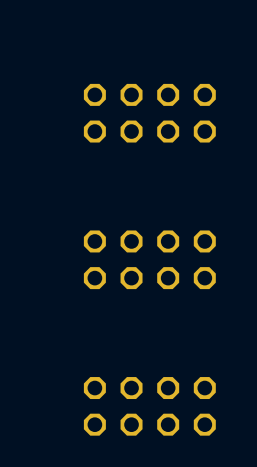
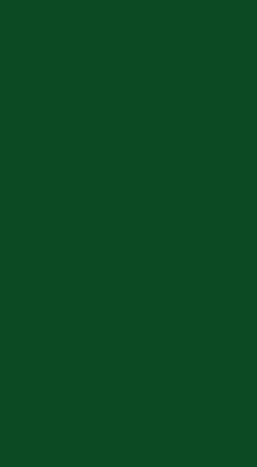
part: (149, 113) -> none
part: (149, 259) -> none
part: (149, 406) -> none

